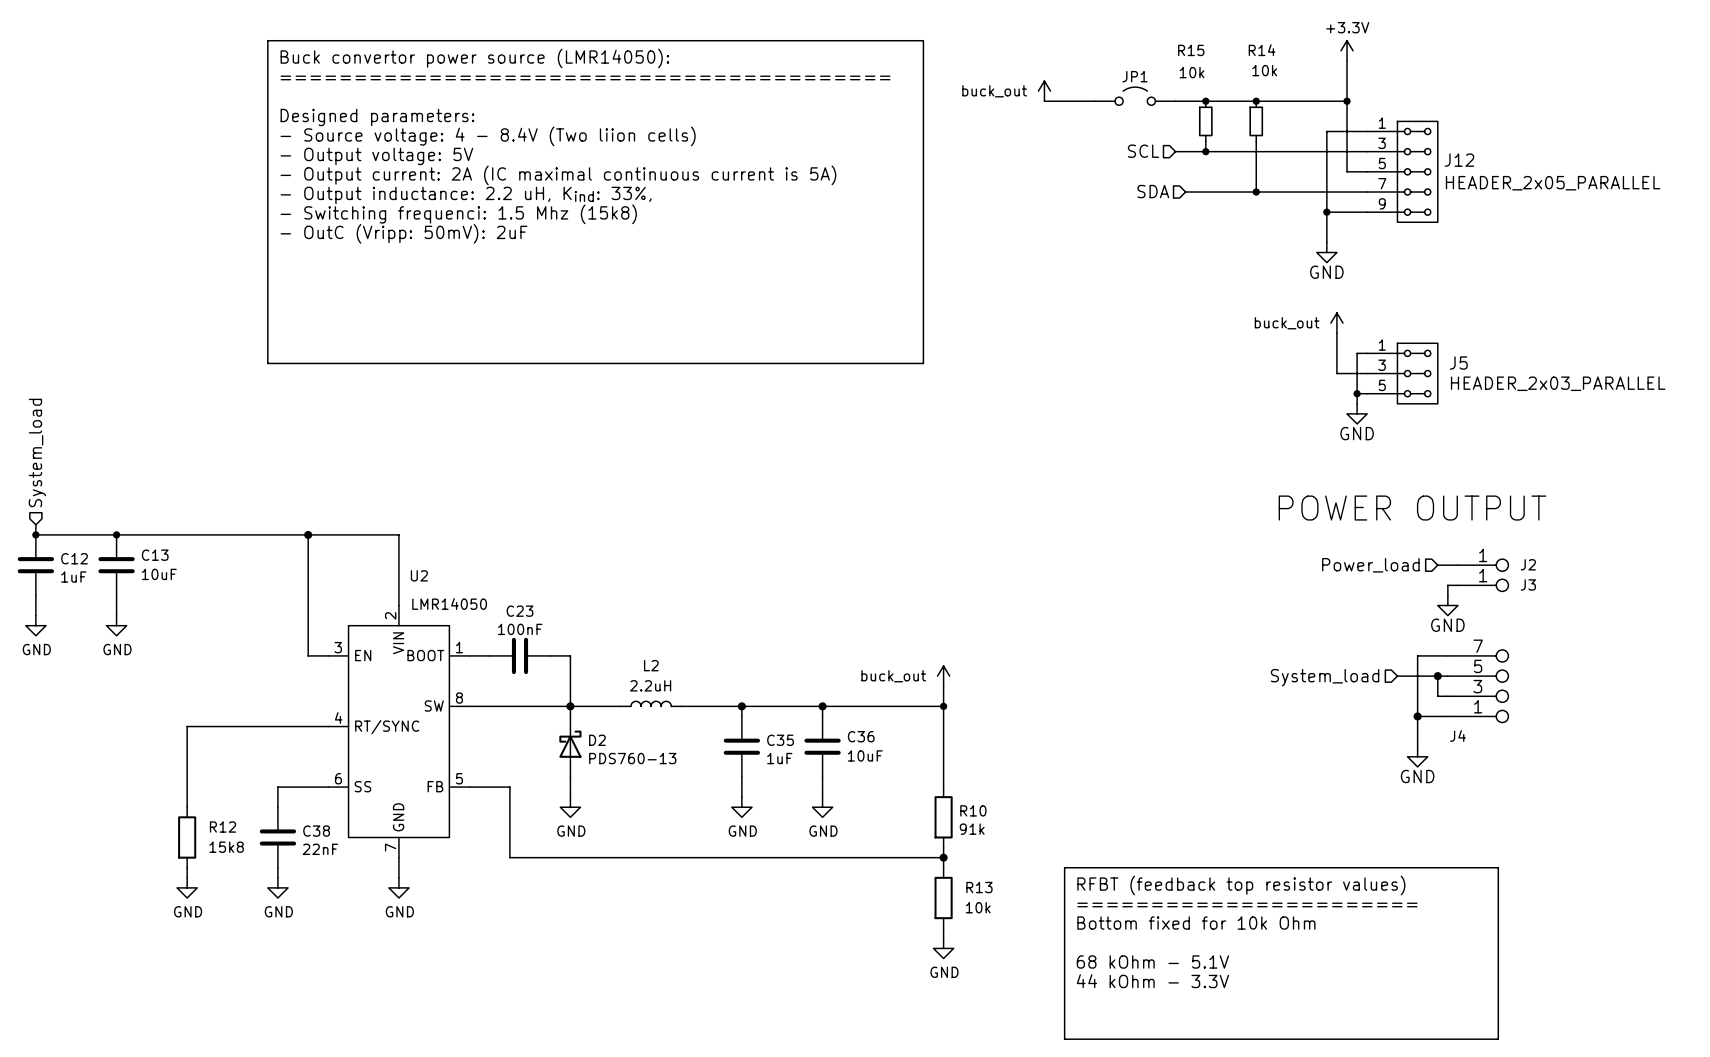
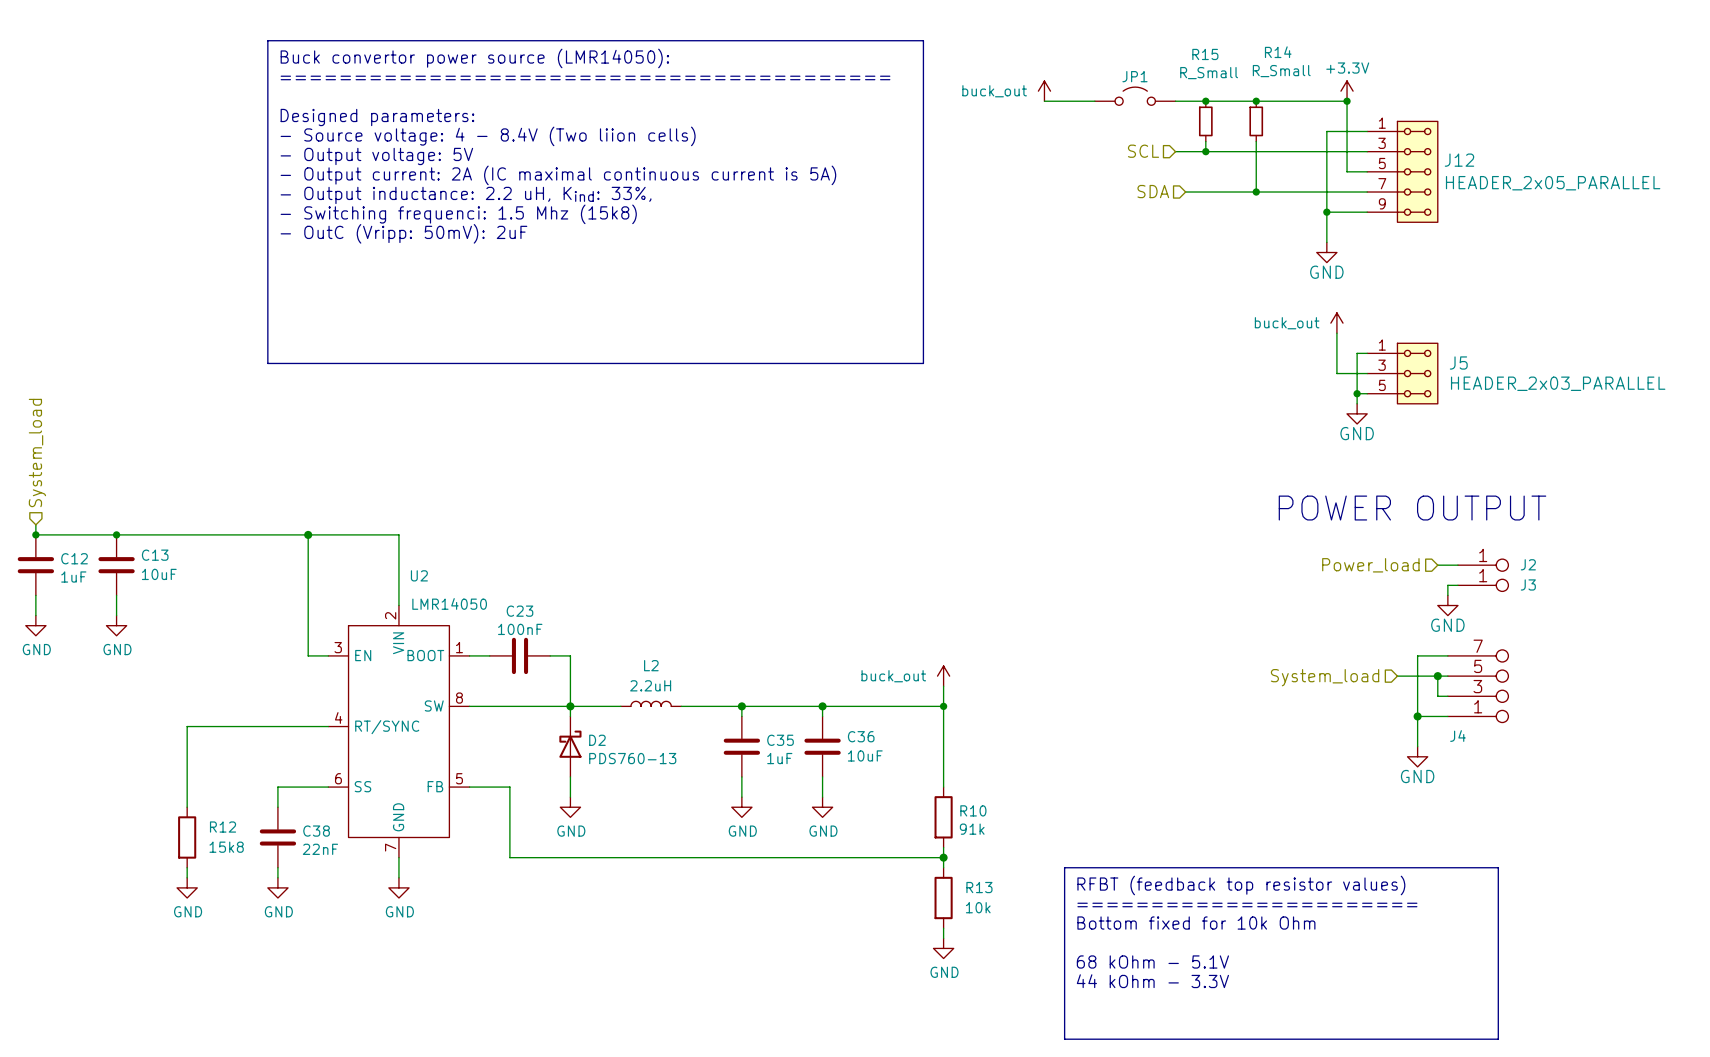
R15 name position: R15 (1191, 50) -> R15 (1205, 54)
R14 name position: R14 (1262, 50) -> R14 (1278, 52)
power symbol position: +3.3V (1347, 50) -> +3.3V (1347, 91)
R14 value: 10k (1264, 70) -> R_Small (1281, 71)
R15 value: 10k (1192, 72) -> R_Small (1209, 73)

